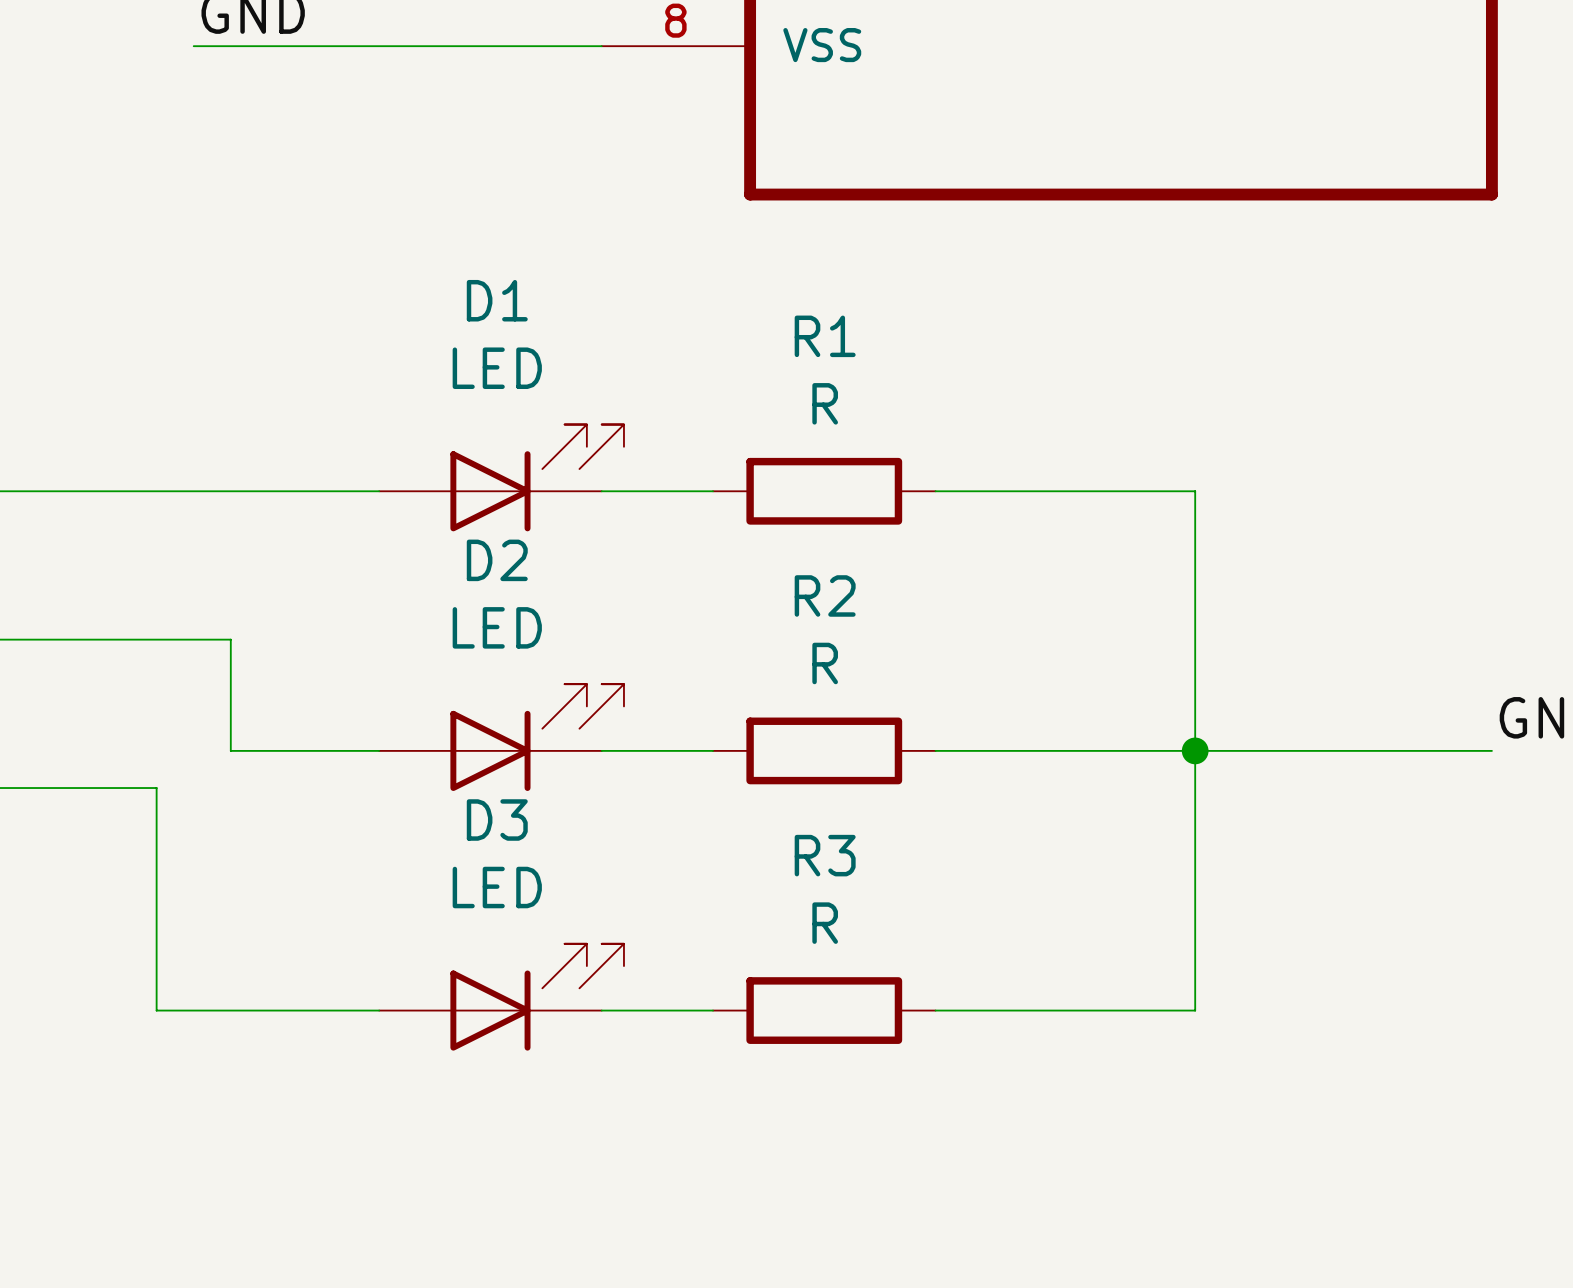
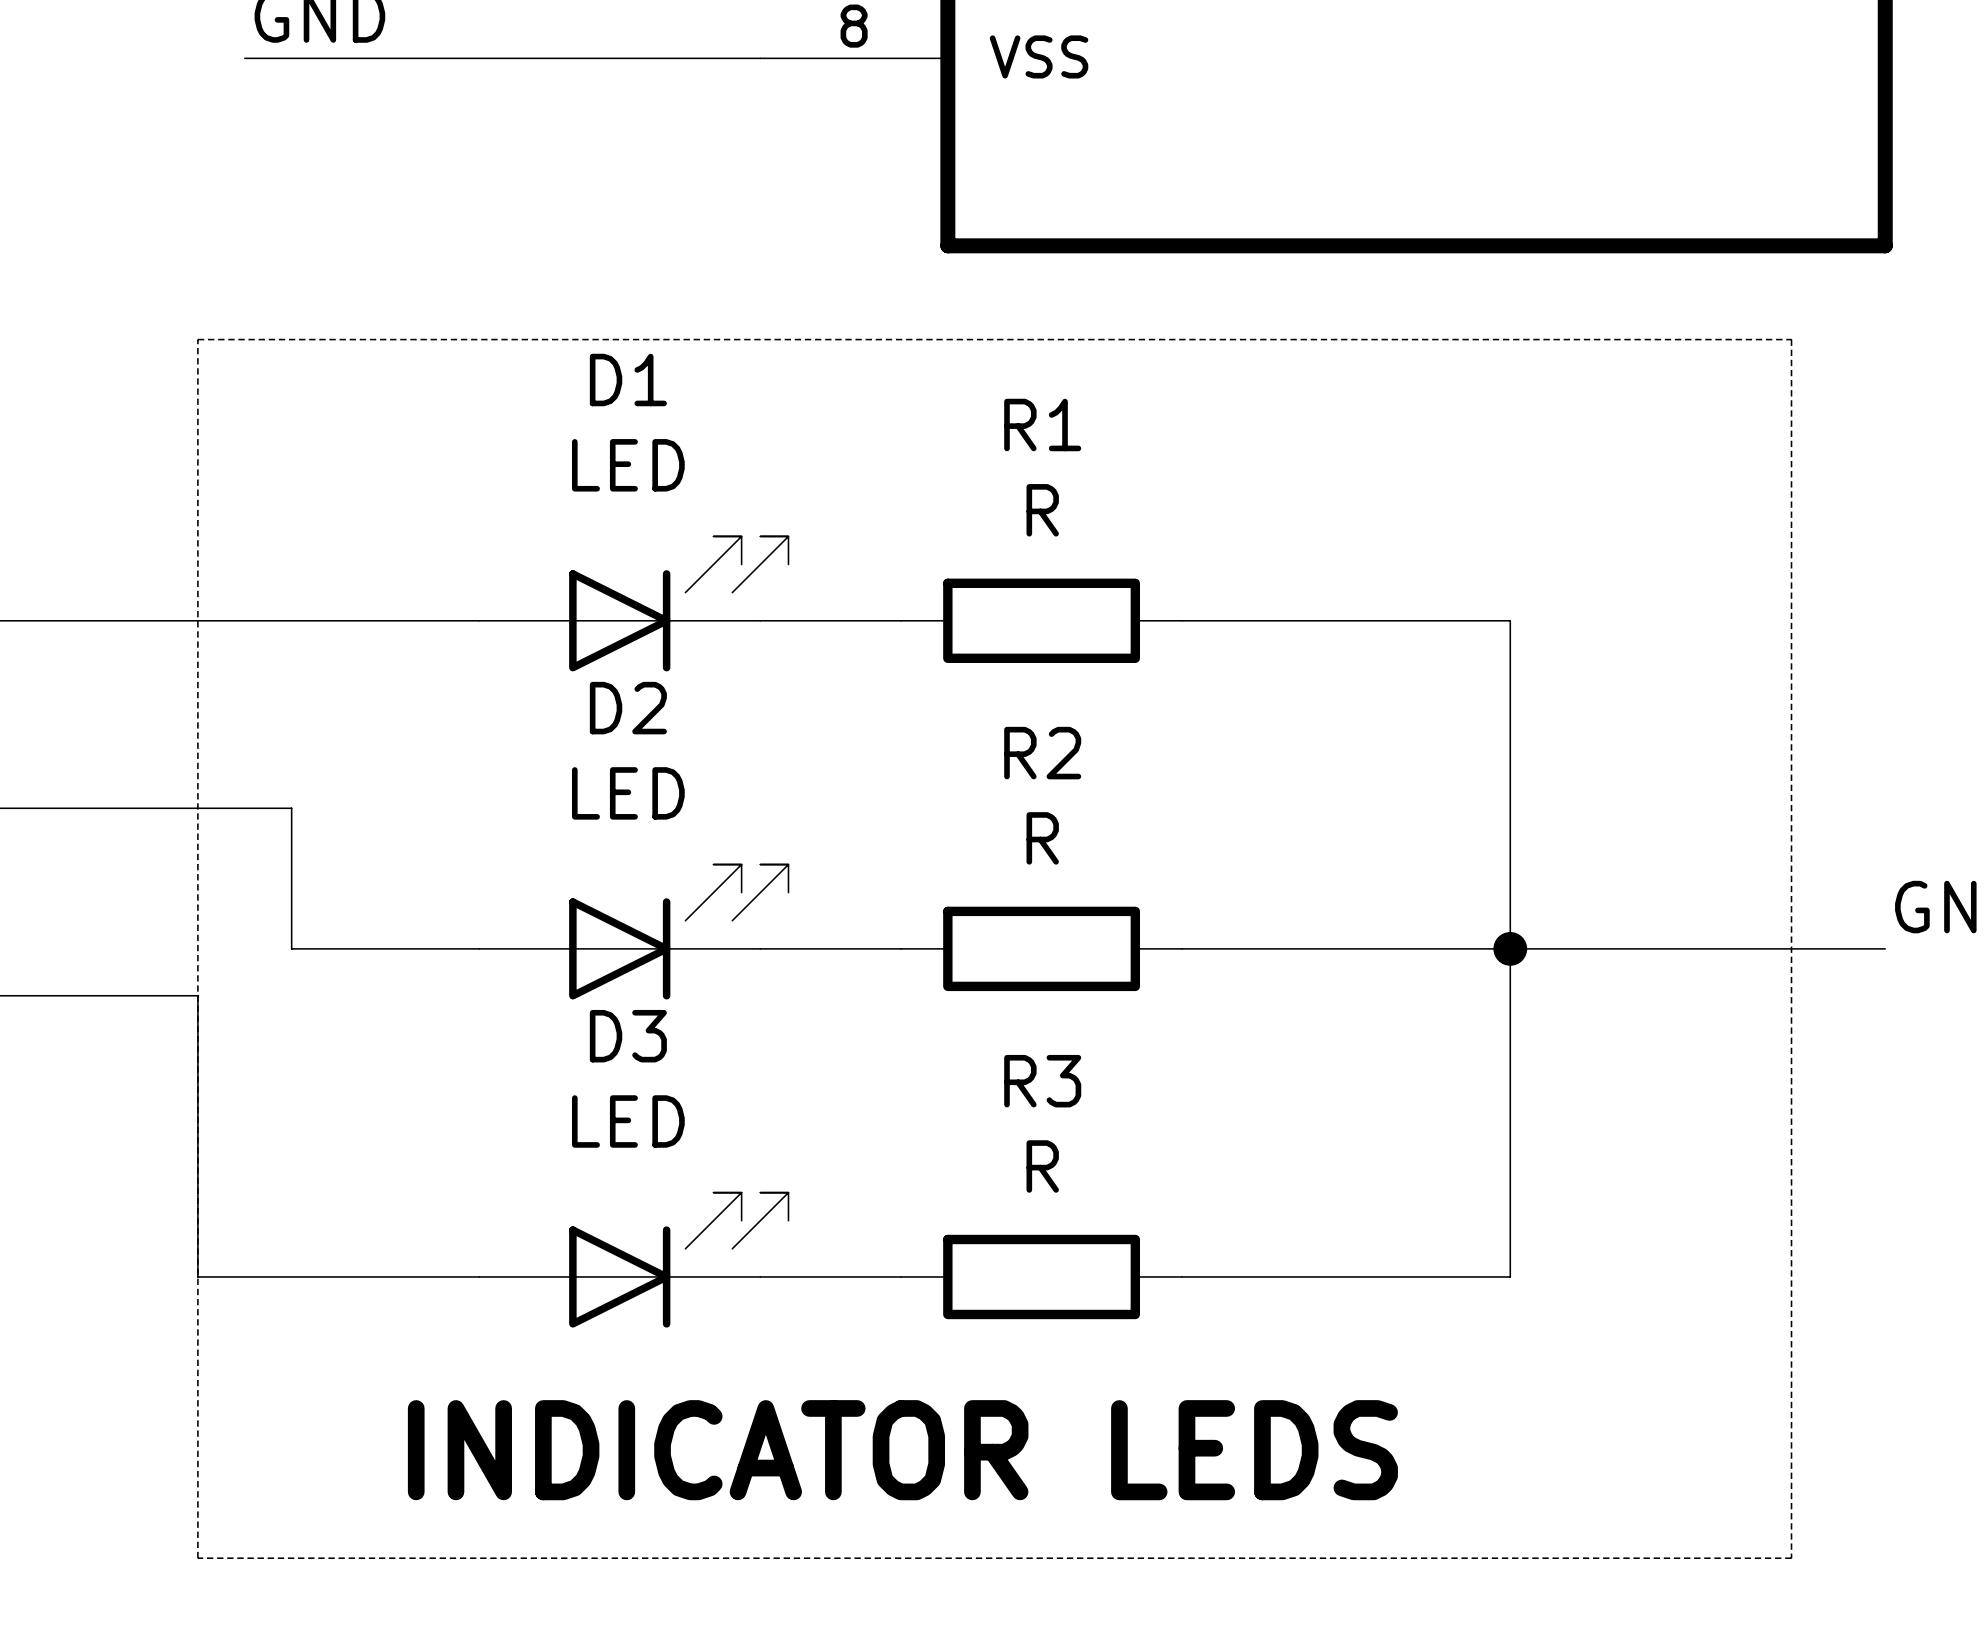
line: none -> (197, 339) (1791, 339) (1791, 1558) (197, 1558) (197, 339)
text: none -> INDICATOR LEDS (902, 1450)

